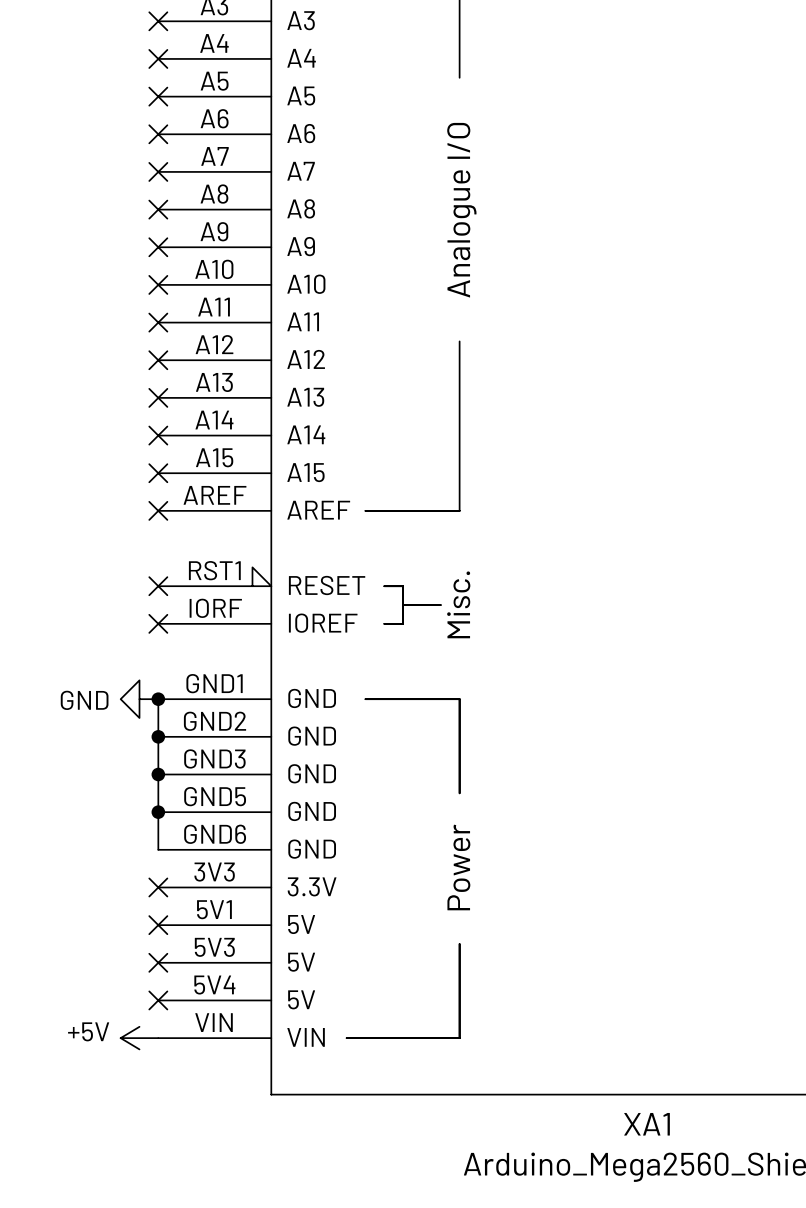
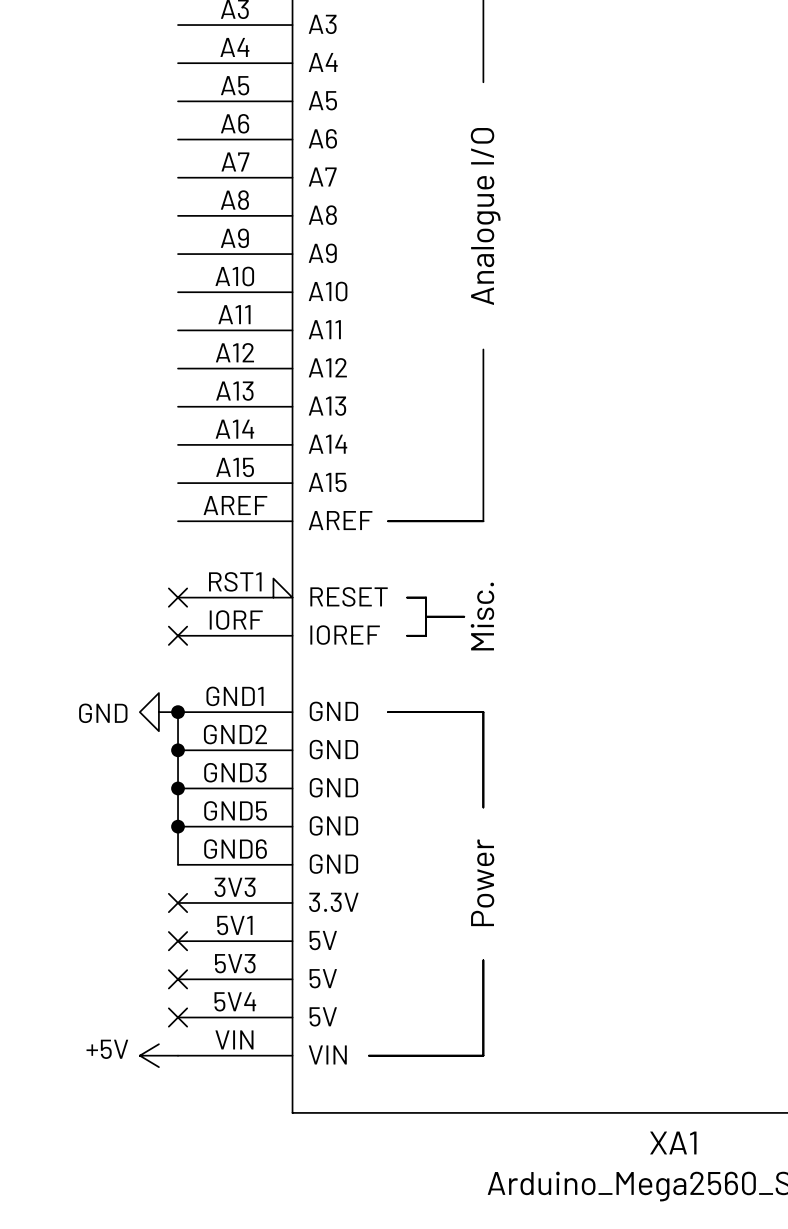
no-connect mark: (158, 21) -> none
no-connect mark: (158, 58) -> none
no-connect mark: (158, 96) -> none
no-connect mark: (158, 134) -> none
no-connect mark: (158, 171) -> none
no-connect mark: (158, 209) -> none
no-connect mark: (158, 247) -> none
no-connect mark: (158, 284) -> none
no-connect mark: (158, 322) -> none
no-connect mark: (158, 360) -> none
no-connect mark: (158, 397) -> none
no-connect mark: (158, 435) -> none
no-connect mark: (158, 473) -> none
no-connect mark: (158, 510) -> none

